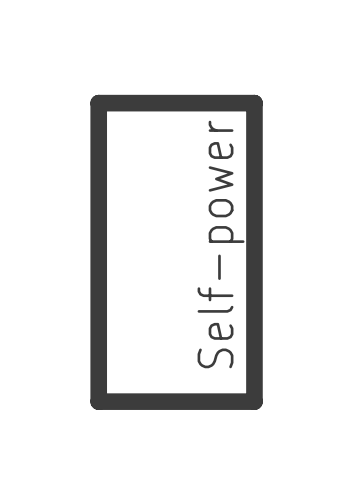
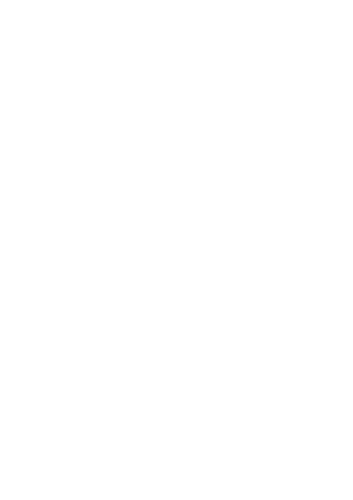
line: (98, 103) (98, 401) (254, 401) (254, 103) (98, 103) -> none
text: Self-power (221, 244) -> none

